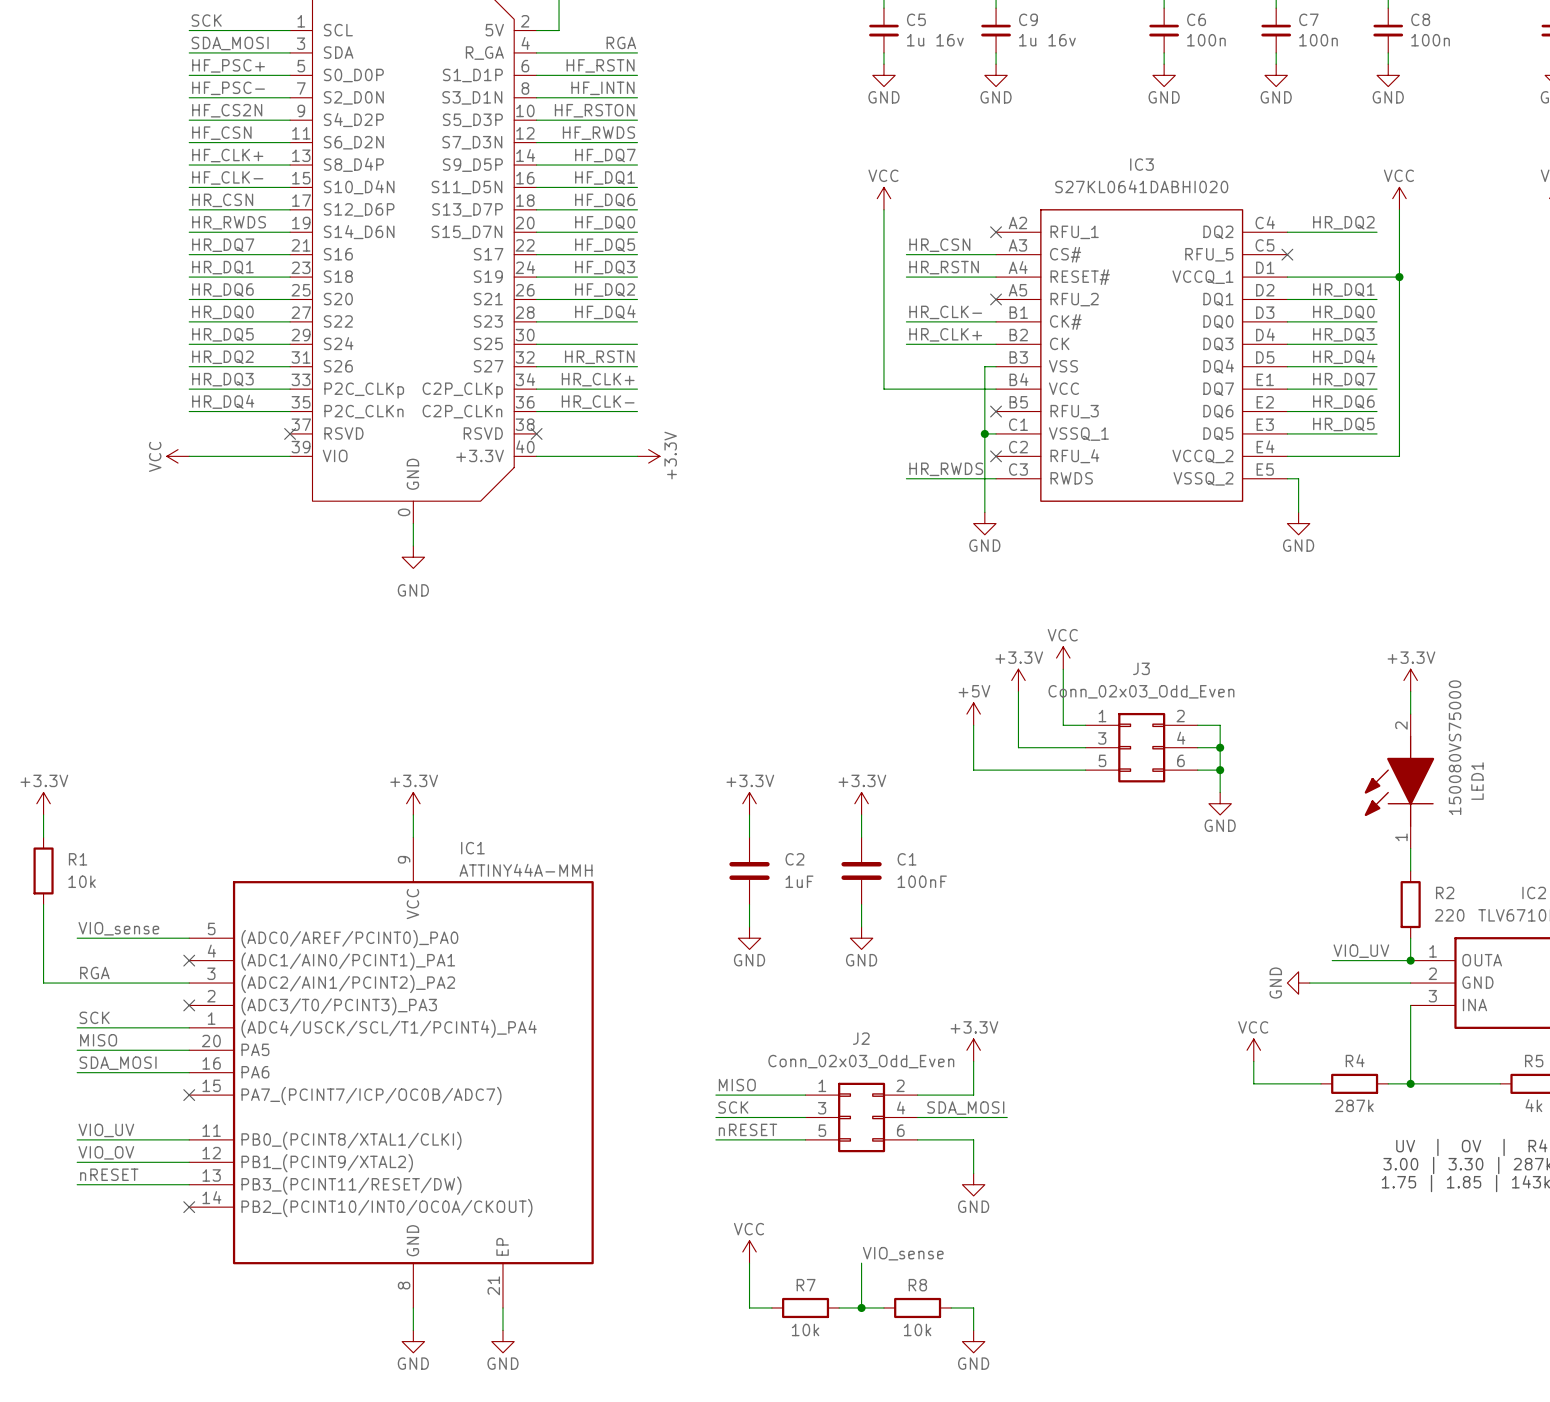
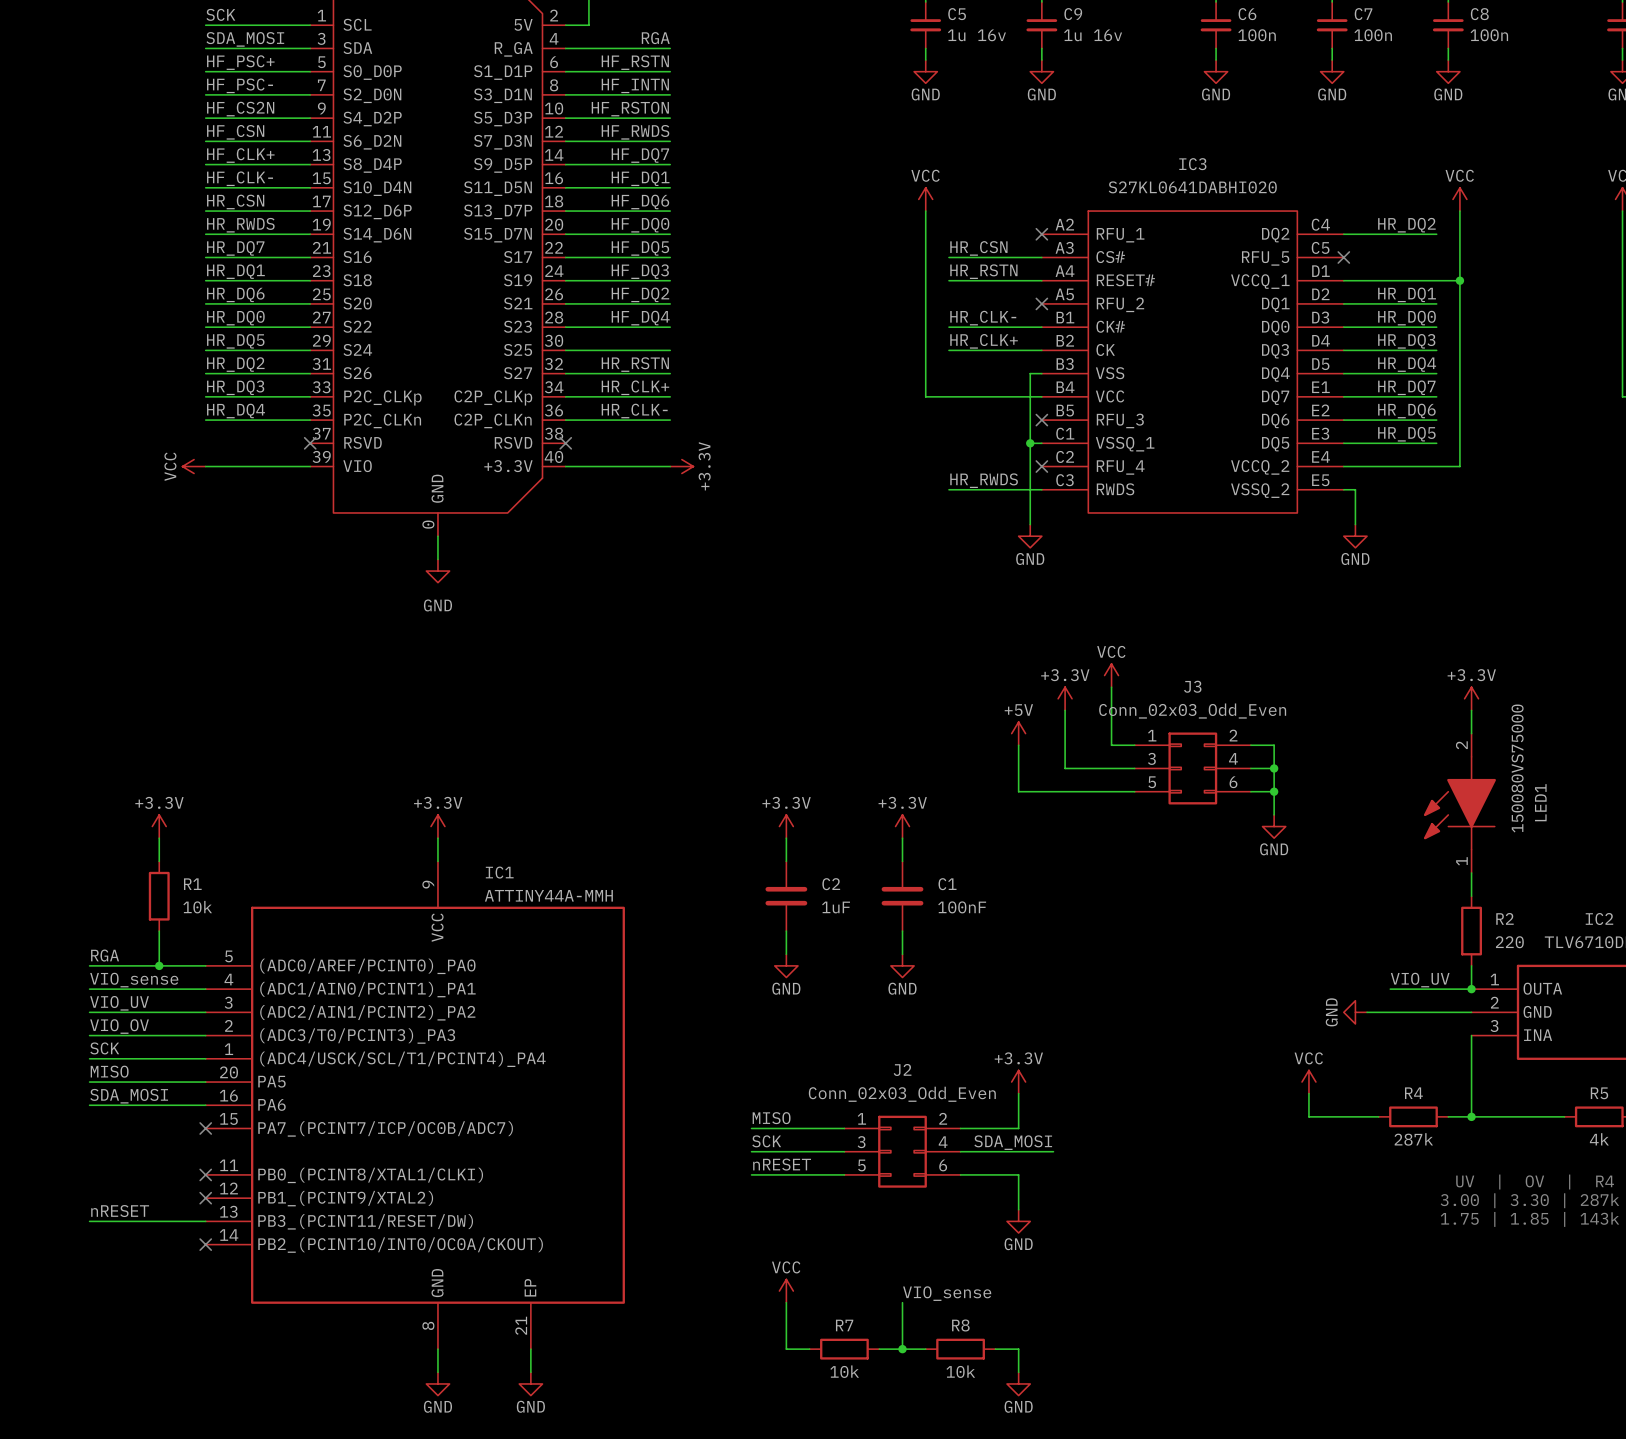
power symbol position: +3.3V (43, 803) -> +3.3V (159, 826)
wire: (43, 814) (43, 837) -> (159, 838) (159, 861)
R1 position: (43, 870) -> (159, 896)
wire: (43, 904) (43, 983) (77, 983) -> none
wire: none -> (159, 931) (159, 965)
label: VIO_sense (118, 928) -> RGA (105, 955)
junction: none -> (159, 965)
label: none -> VIO_sense (134, 980)
no-connect mark: (189, 960) -> none
label: RGA (94, 973) -> VIO_UV (119, 1003)
no-connect mark: (189, 1005) -> none
label: VIO_UV (106, 1130) -> none
wire: (77, 1139) (189, 1139) -> (89, 1035) (205, 1035)
no-connect mark: none -> (205, 1174)
label position: VIO_OV (106, 1152) -> VIO_OV (119, 1026)
wire: (77, 1162) (189, 1162) -> (89, 989) (205, 989)
no-connect mark: none -> (205, 1198)

